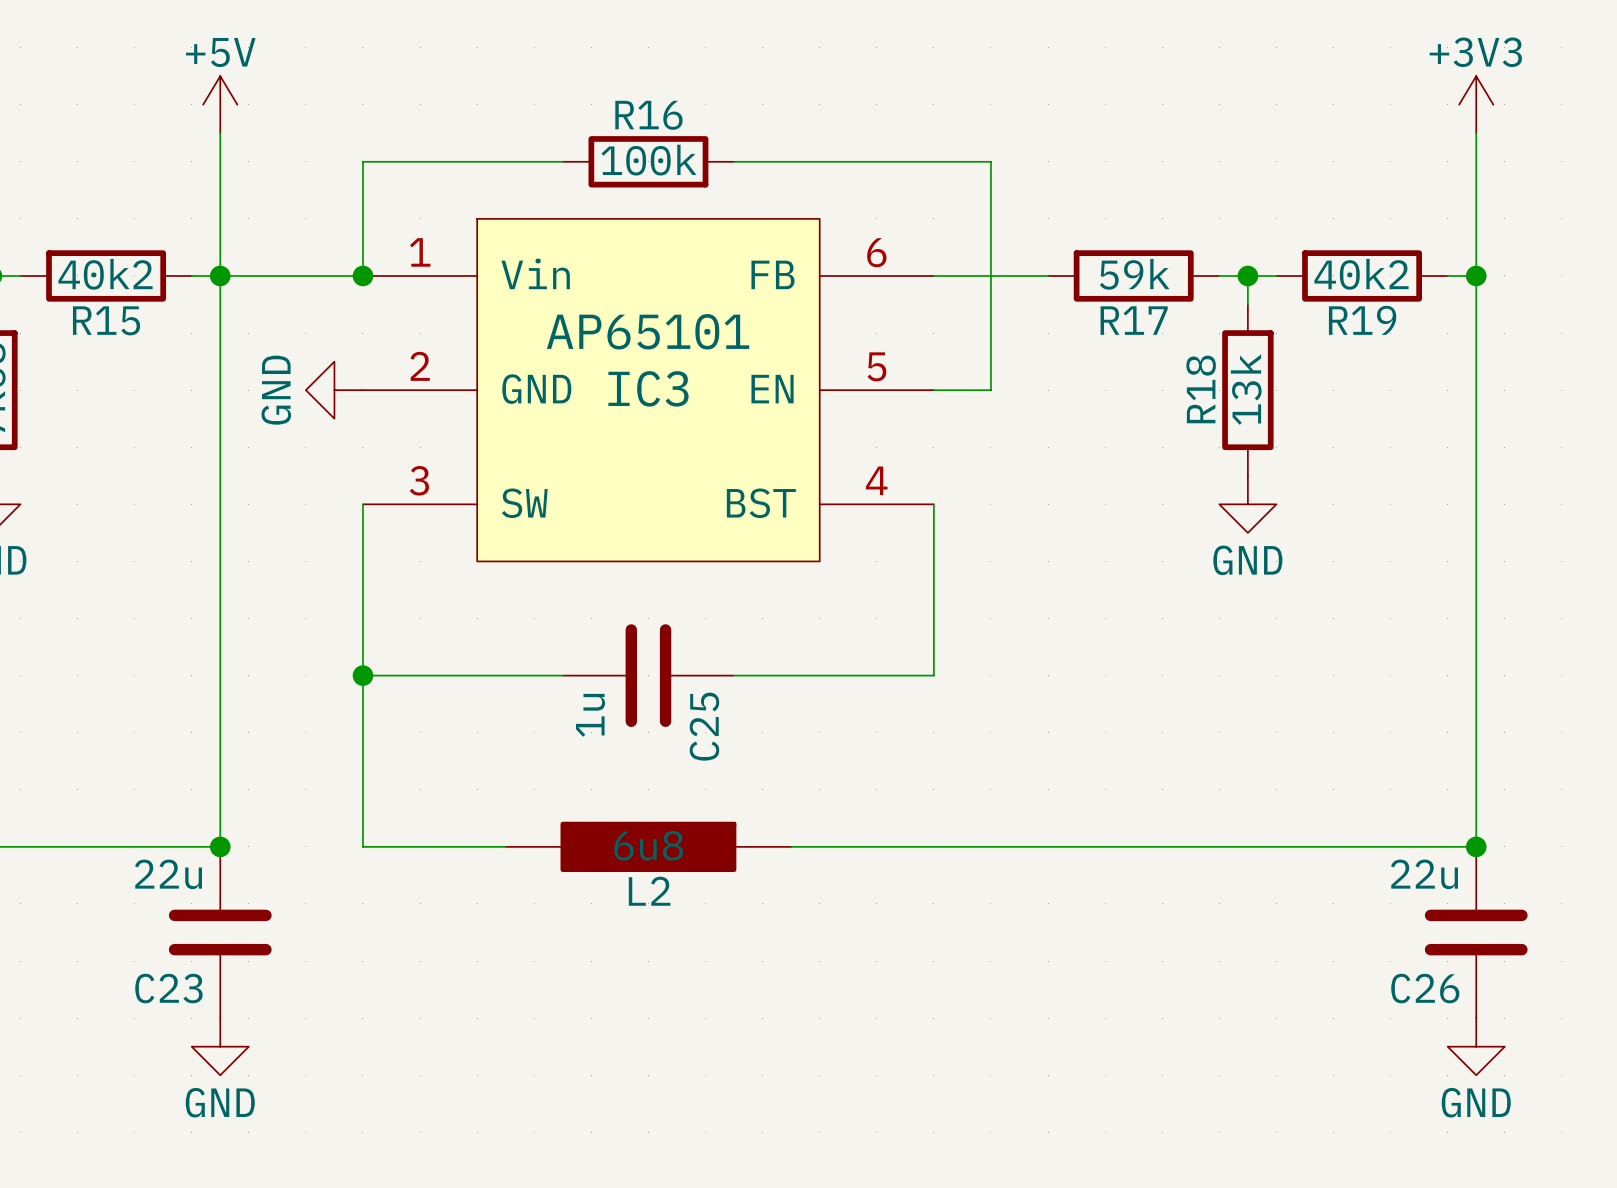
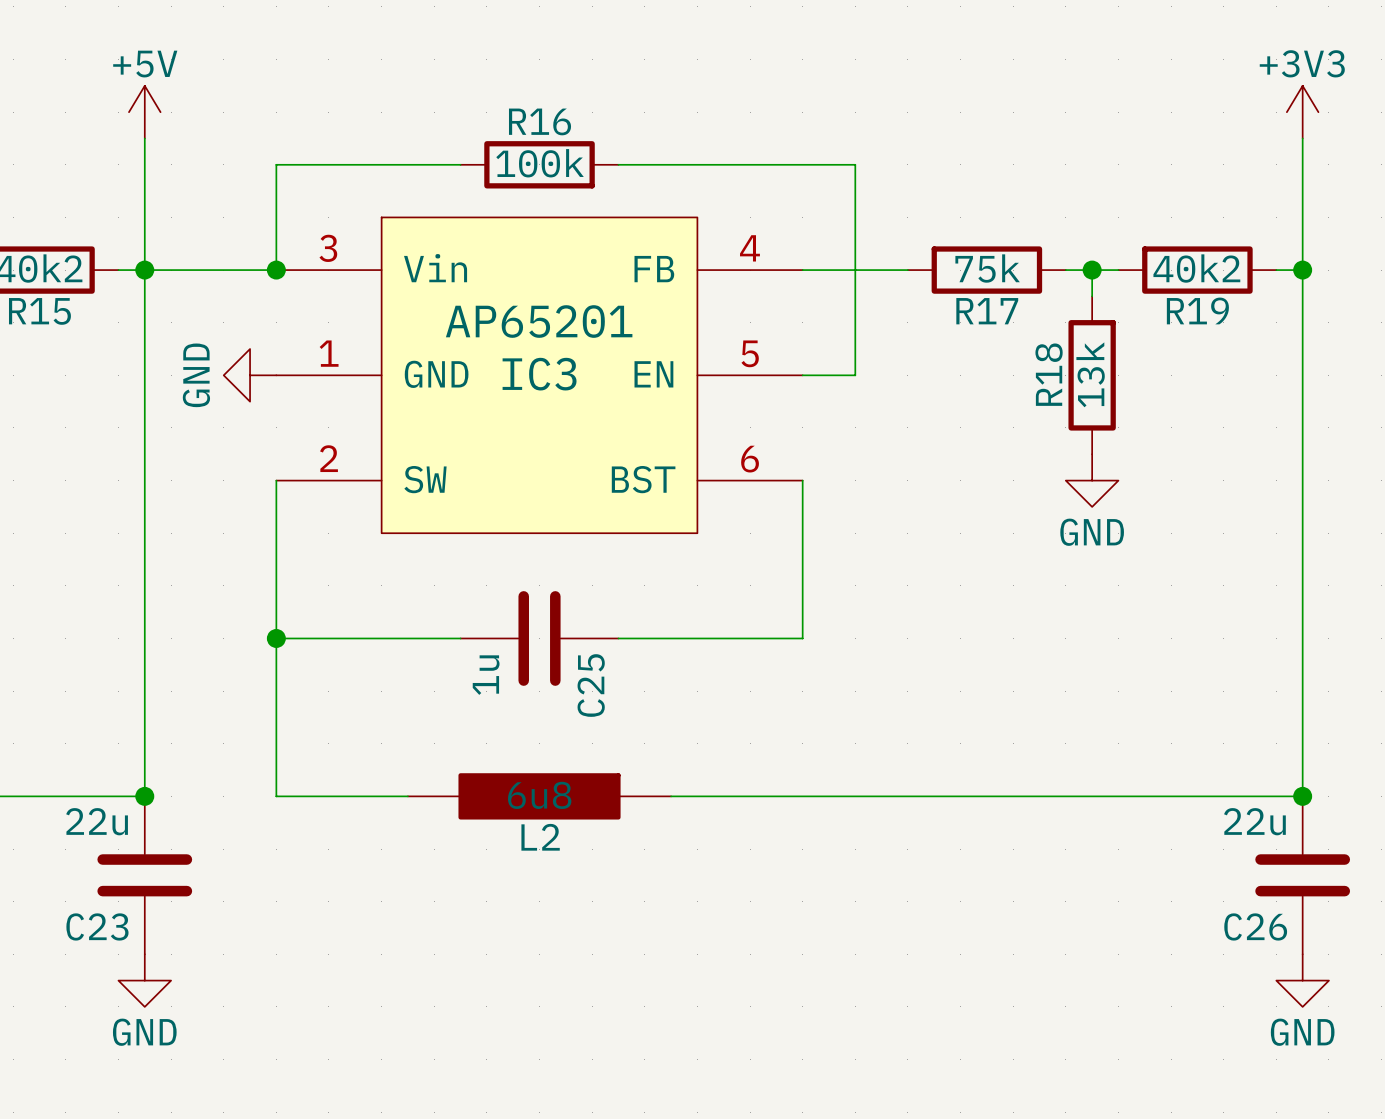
IC3 pin number: 1 (420, 252) -> 3 (328, 248)
IC3 pin number: 6 (876, 252) -> 4 (749, 248)
R17 value: 59k (1134, 274) -> 75k (987, 268)
IC3 value: AP65101 (648, 331) -> AP65201 (539, 321)
IC3 pin number: 2 (420, 366) -> 1 (329, 353)
IC3 pin number: 3 (419, 480) -> 2 (329, 458)
IC3 pin number: 4 (876, 480) -> 6 (750, 459)

